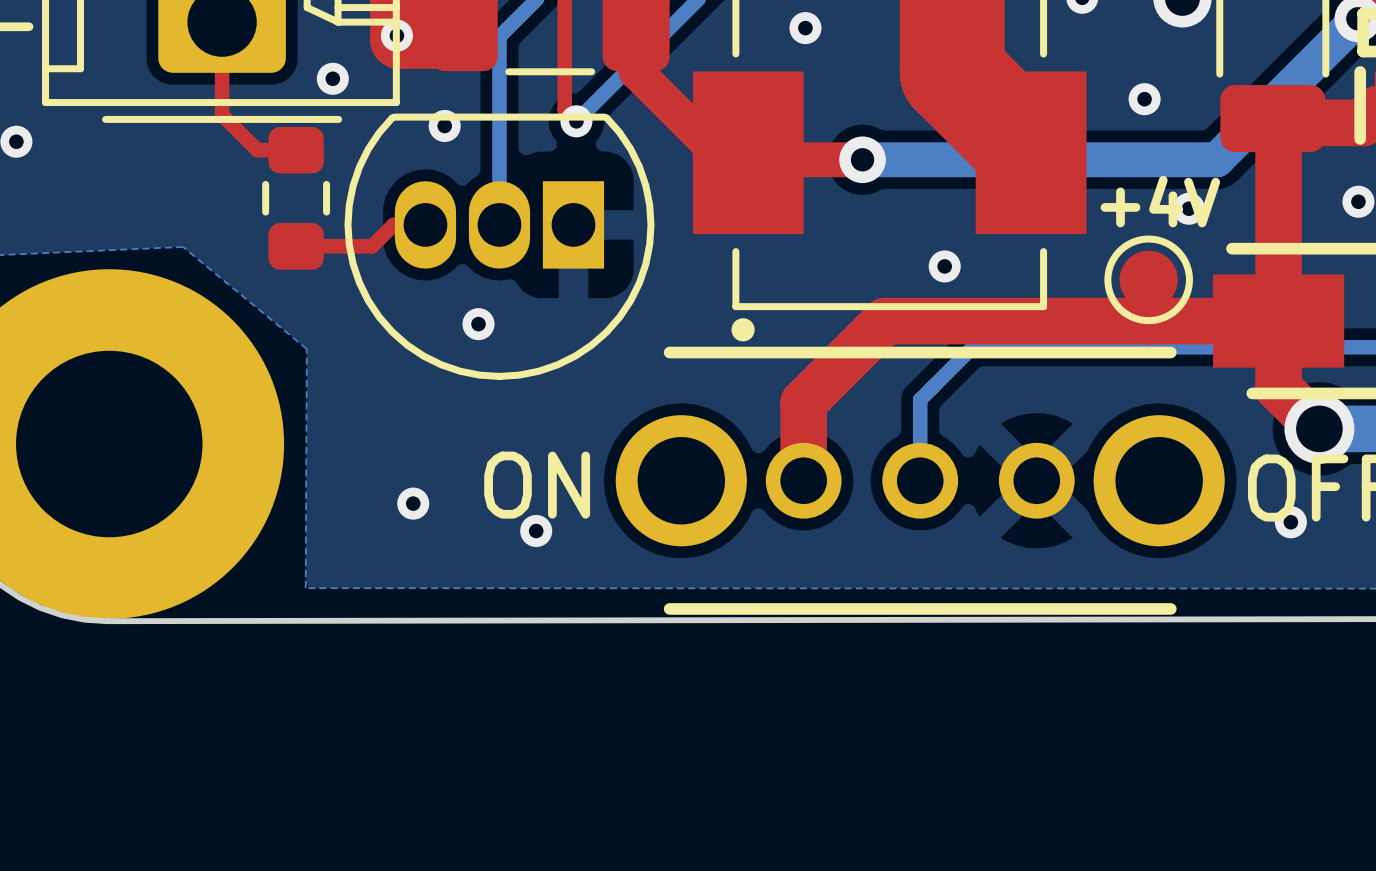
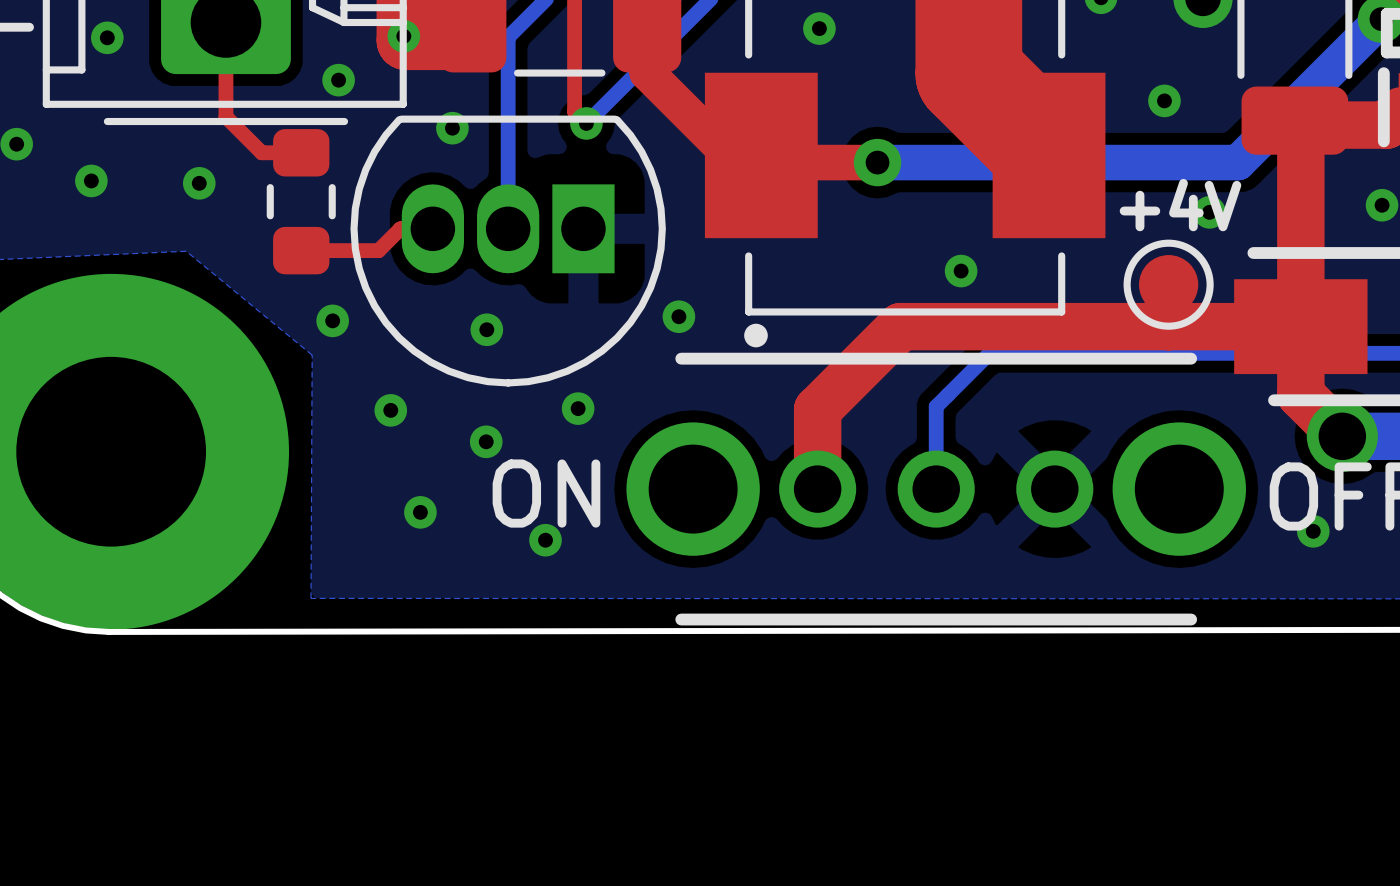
via: none -> (107, 37)
via: none -> (91, 180)
via: none -> (199, 183)
via: none -> (678, 316)
via: none -> (332, 320)
via: none -> (578, 408)
via: none -> (390, 410)
via: none -> (486, 441)

